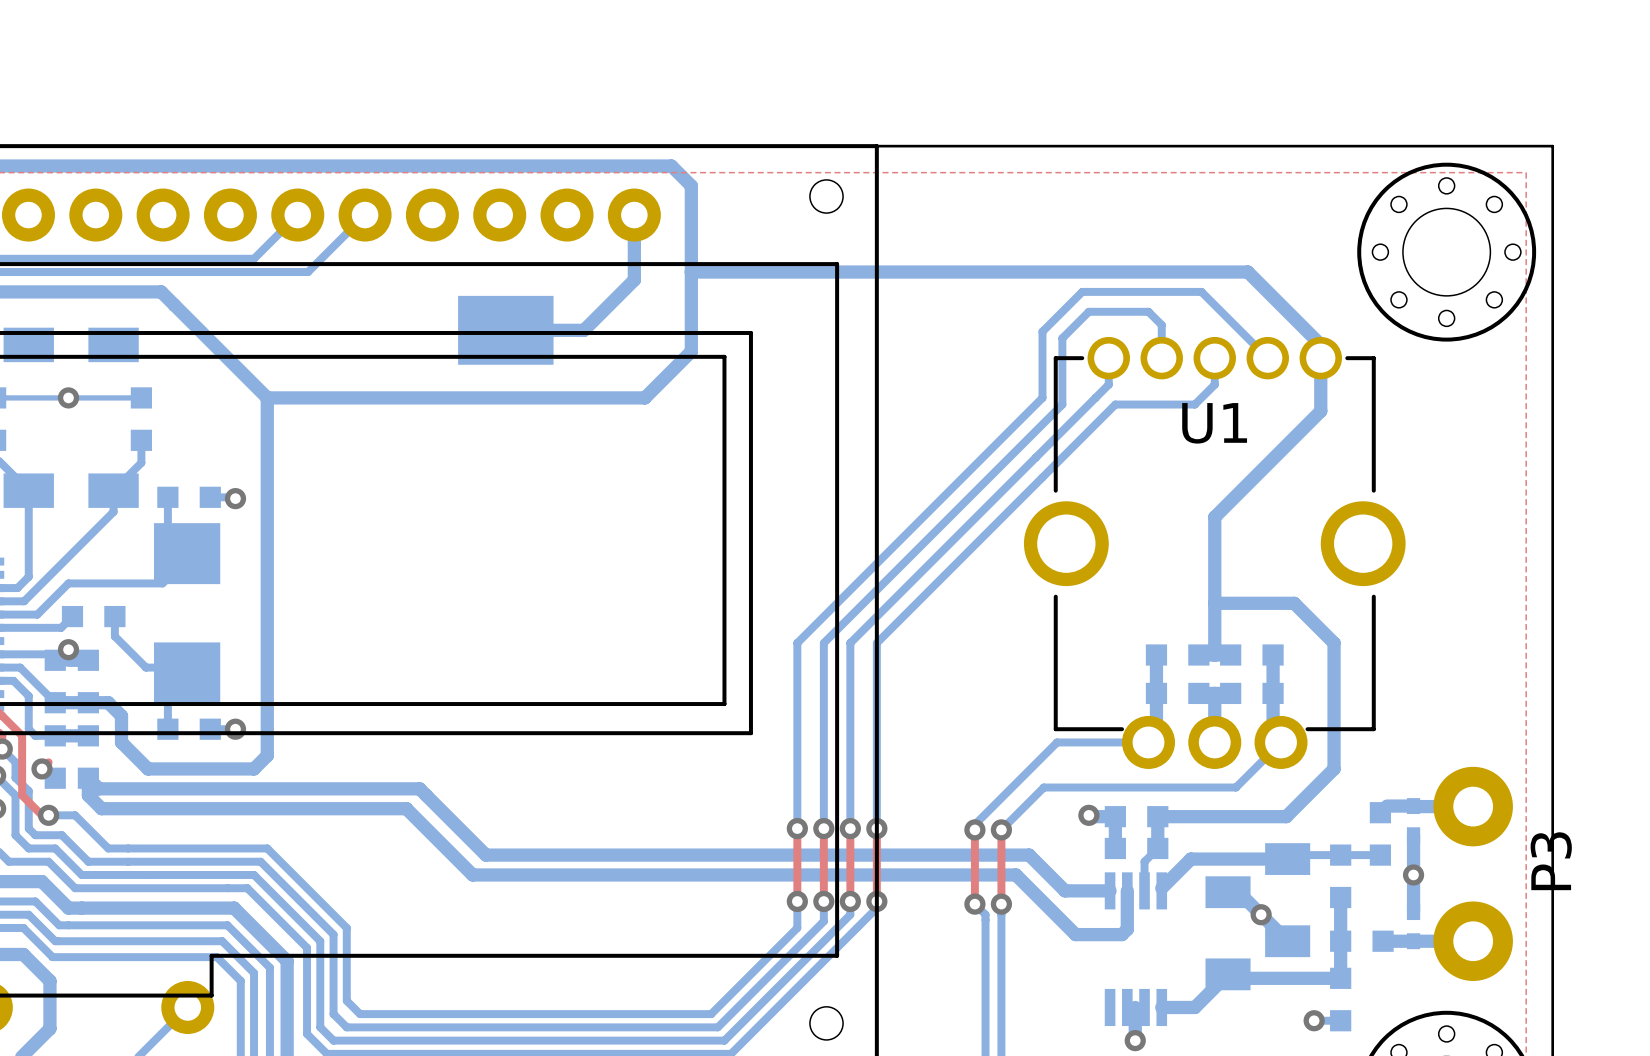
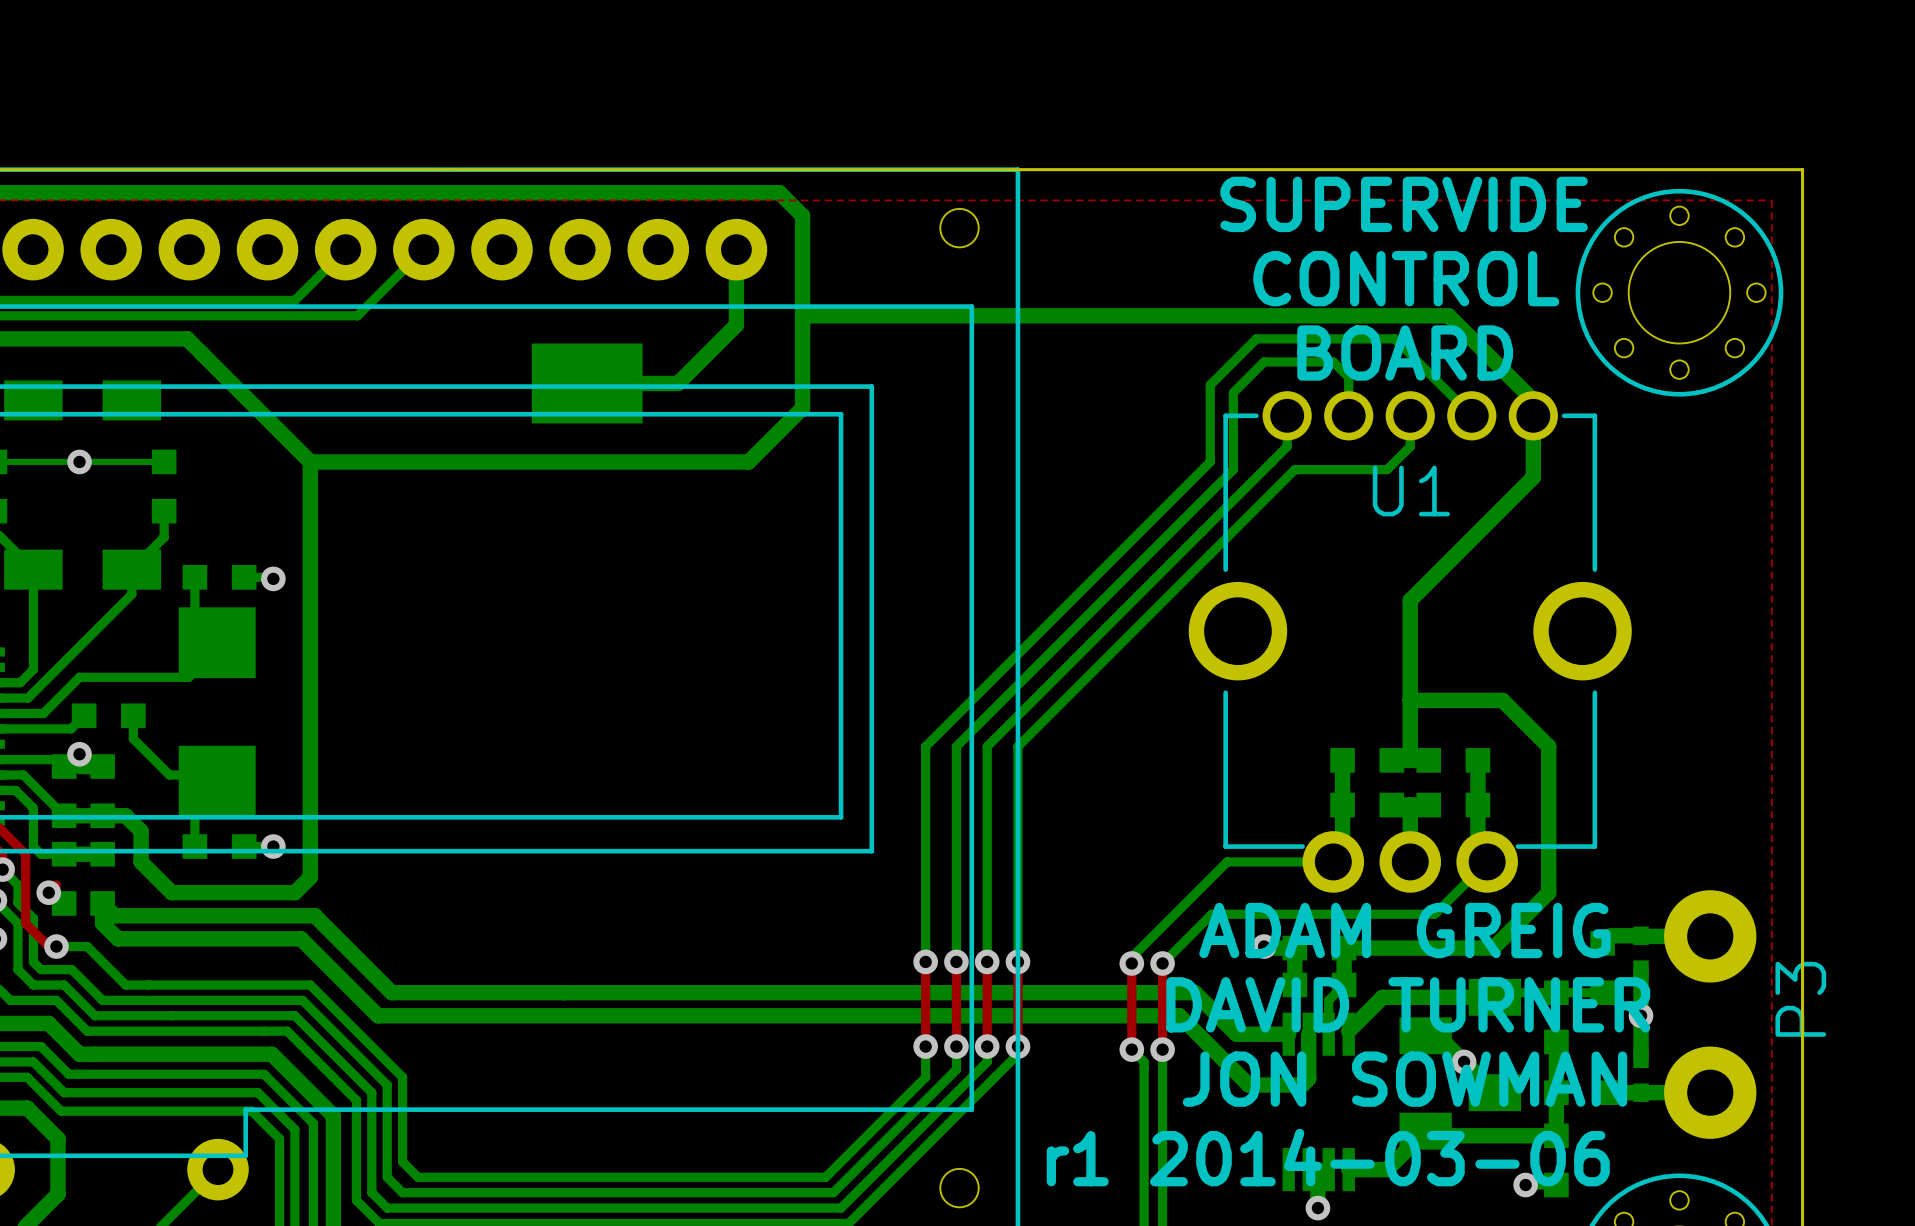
text: none -> SUPERVIDE (1404, 204)
text: none -> CONTROL (1406, 278)
text: none -> BOARD (1405, 353)
bottom track: (271, 788) (419, 788) (485, 855) -> (314, 915) (391, 992) (564, 992)
text: none -> ADAM GREIG (1404, 930)
bottom track: (259, 808) (406, 808) (472, 874) -> (301, 938) (377, 1015) (548, 1015)
text: none -> DAVID TURNER (1408, 1004)
text: none -> JON SOWMAN (1404, 1079)
text: none -> r1 2014-03-06 (1328, 1157)

